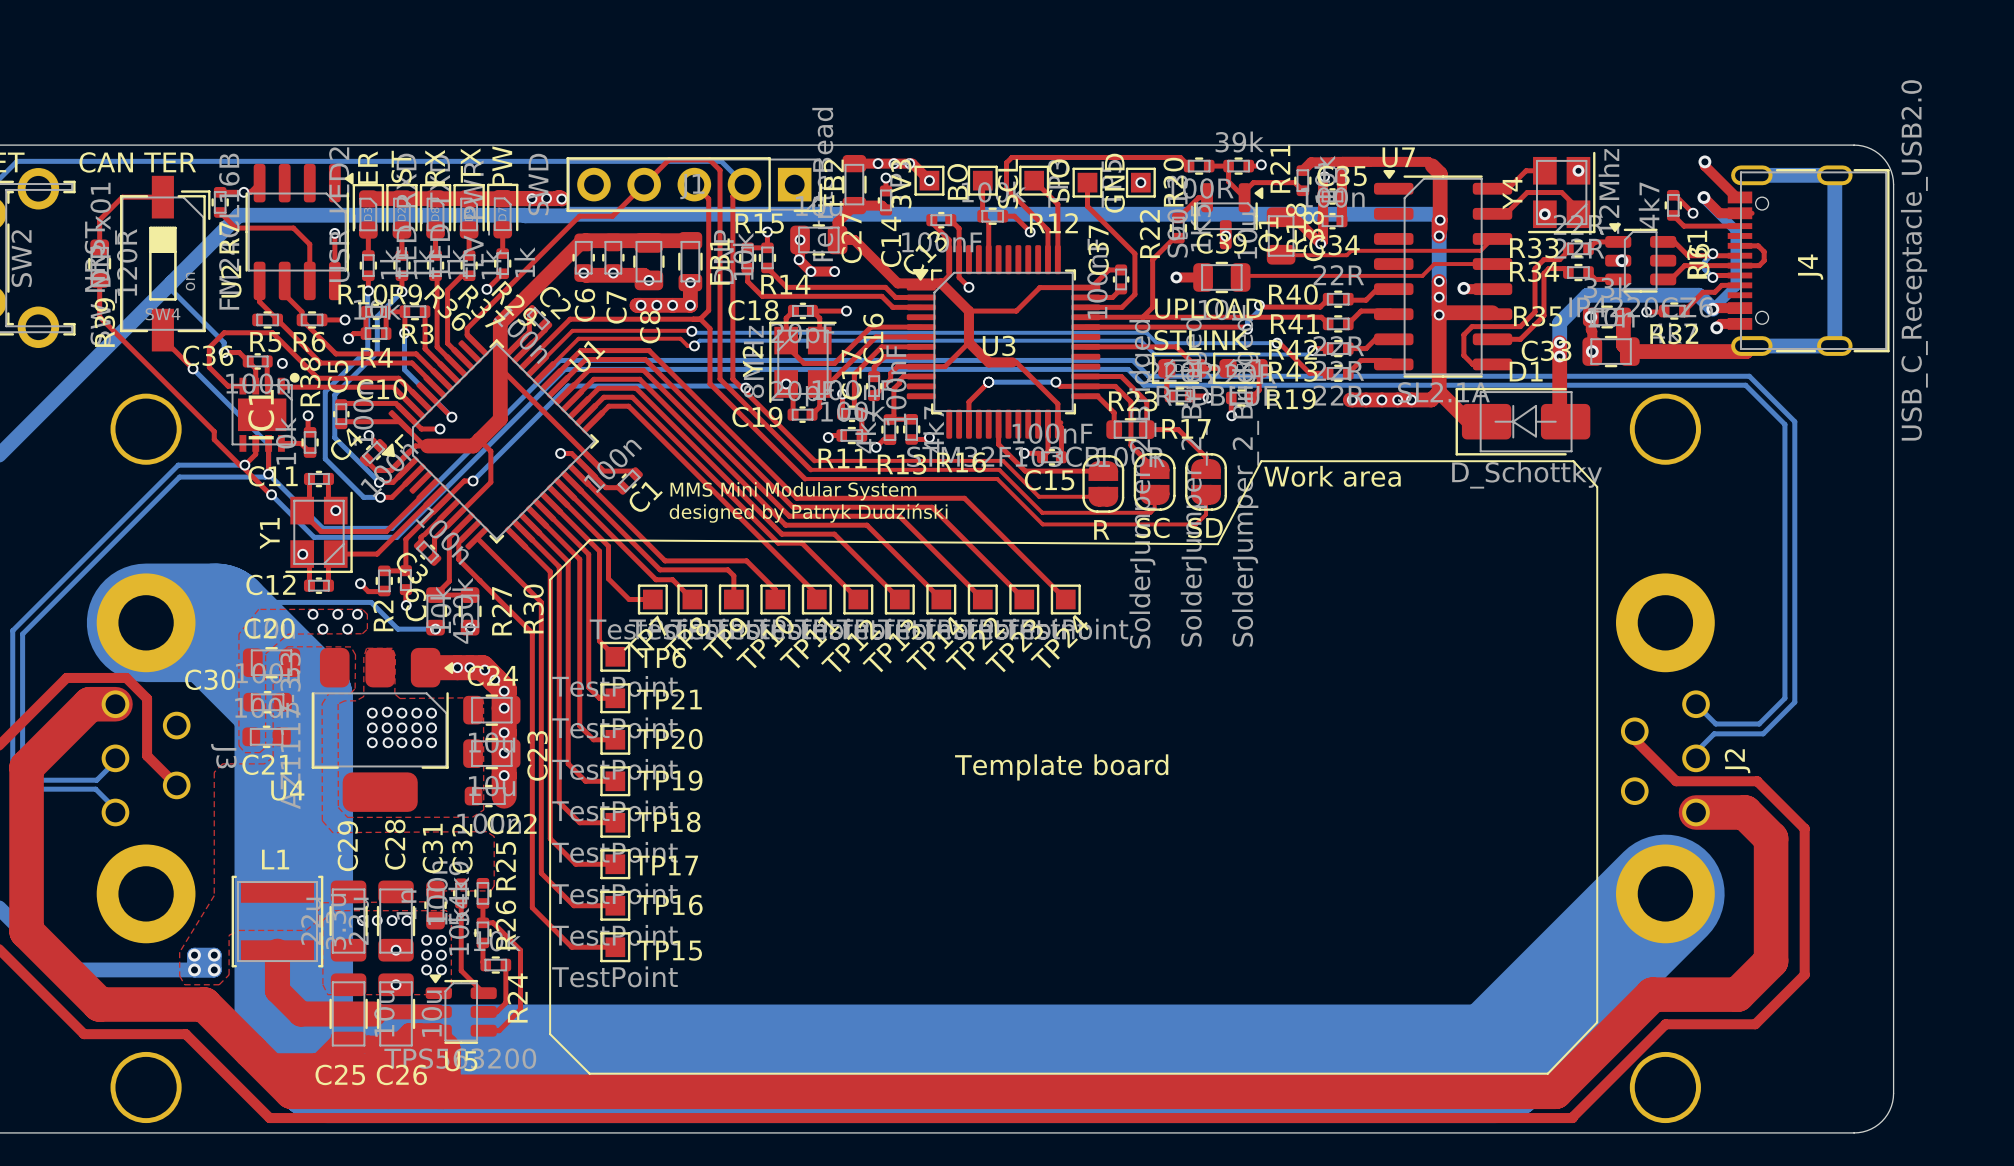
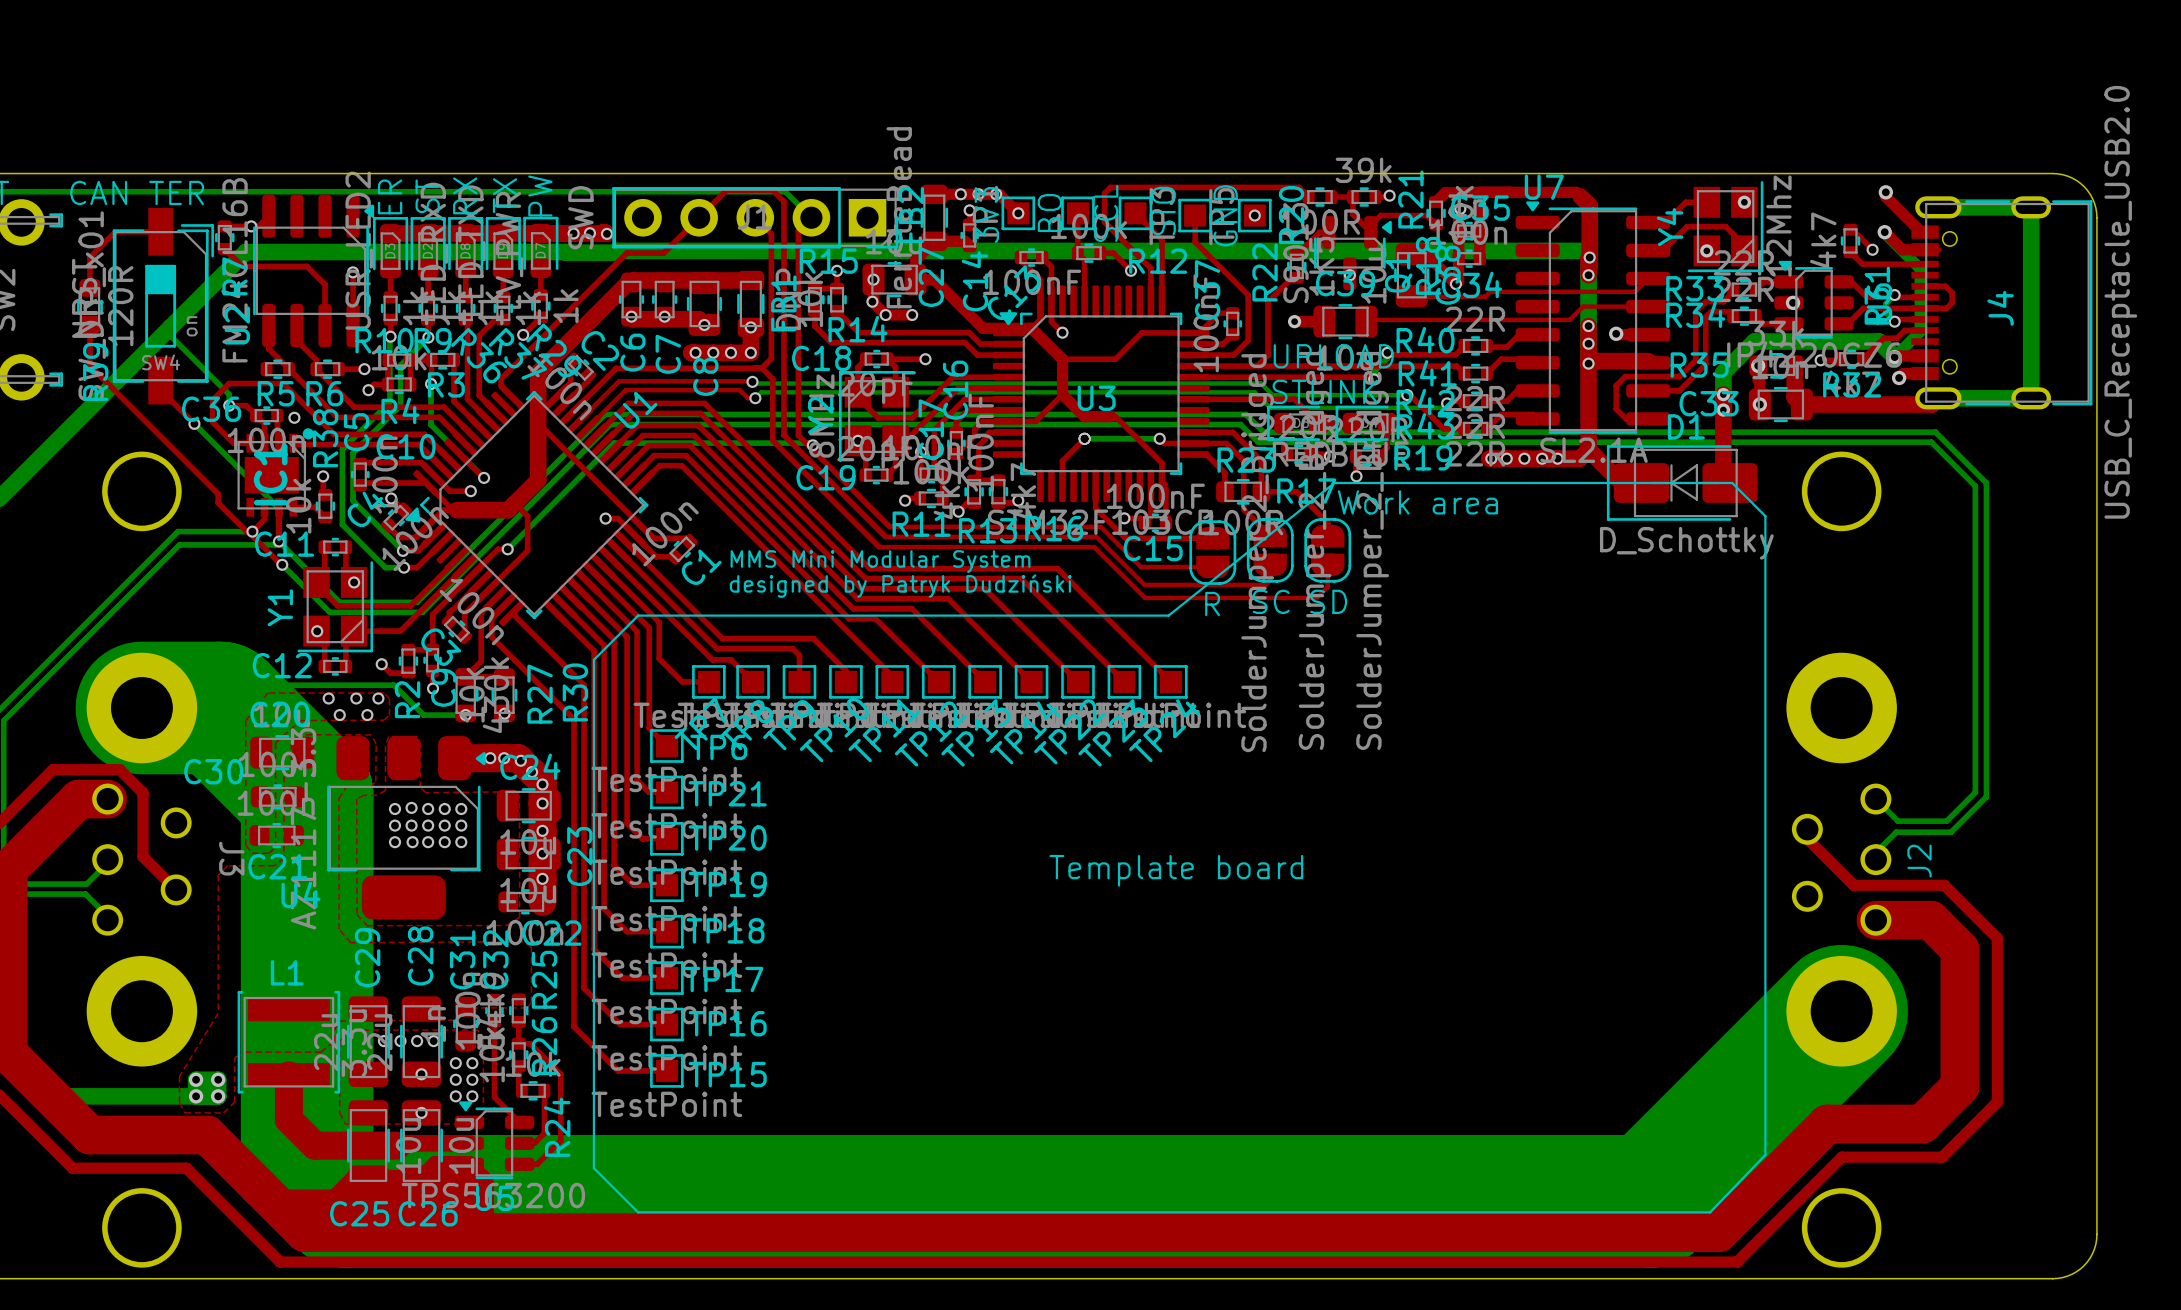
text position: Work area (1332, 476) -> Work area (1417, 502)
line: (1597, 486) (1573, 461) (1261, 461) (1217, 544) (589, 540) -> (1765, 555) (1765, 516) (1732, 482) (1334, 482) (1168, 615) (638, 615)

